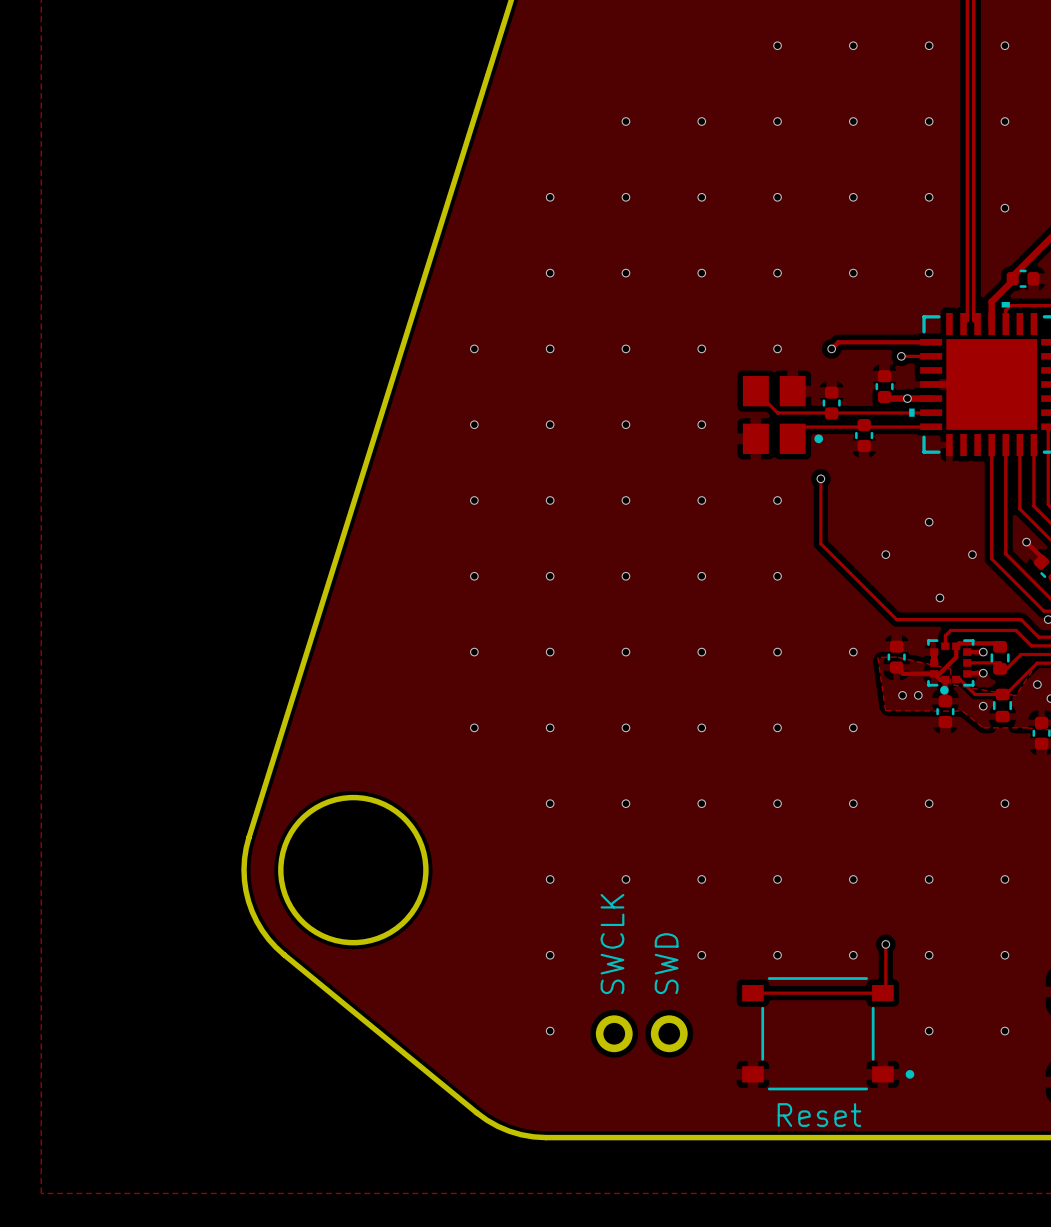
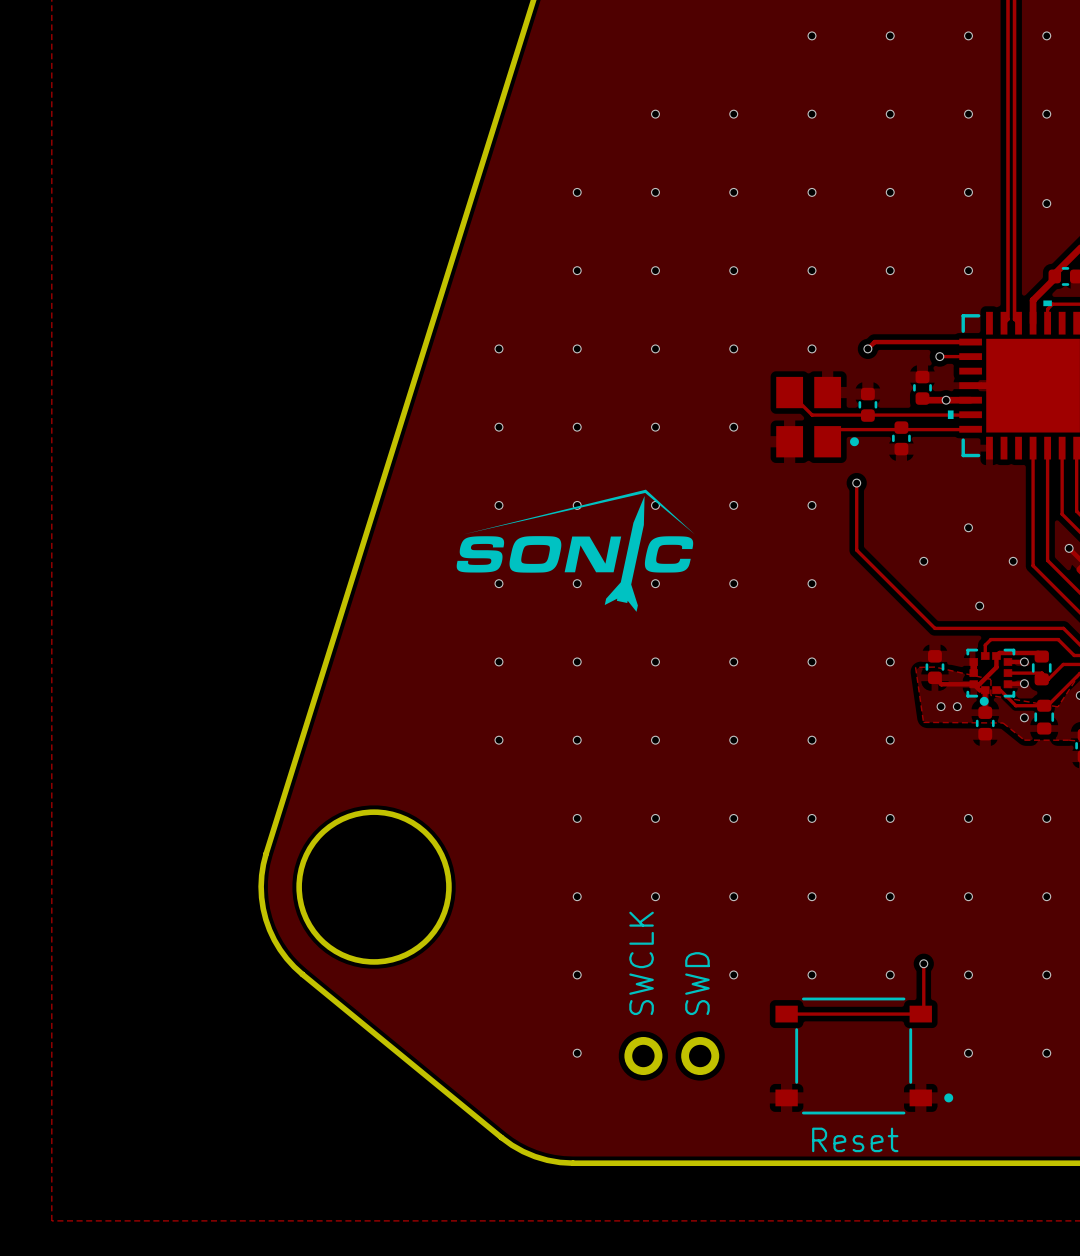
drawing: none -> [456, 489, 695, 612]

